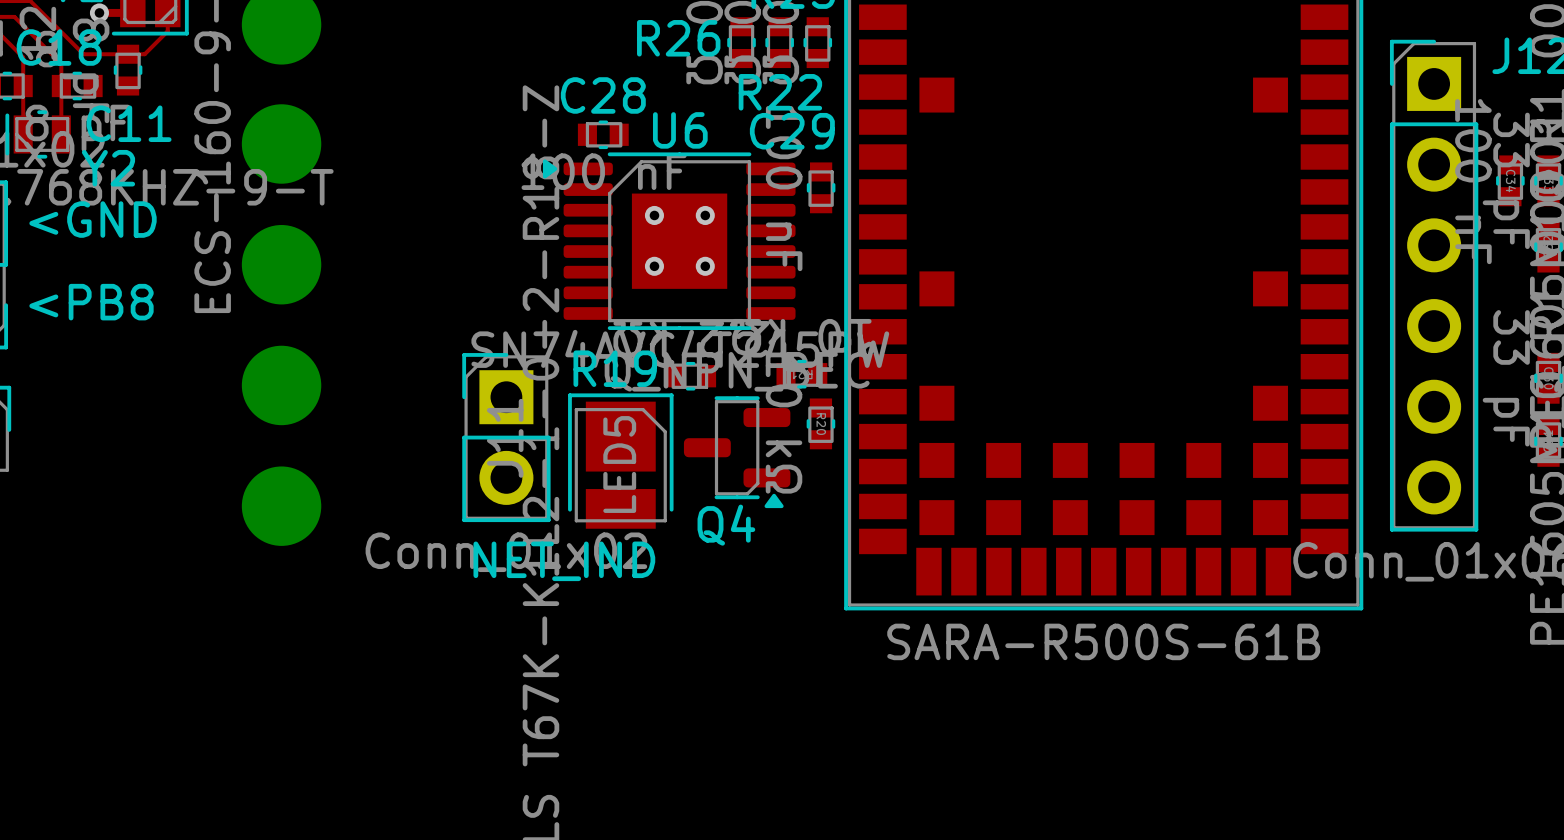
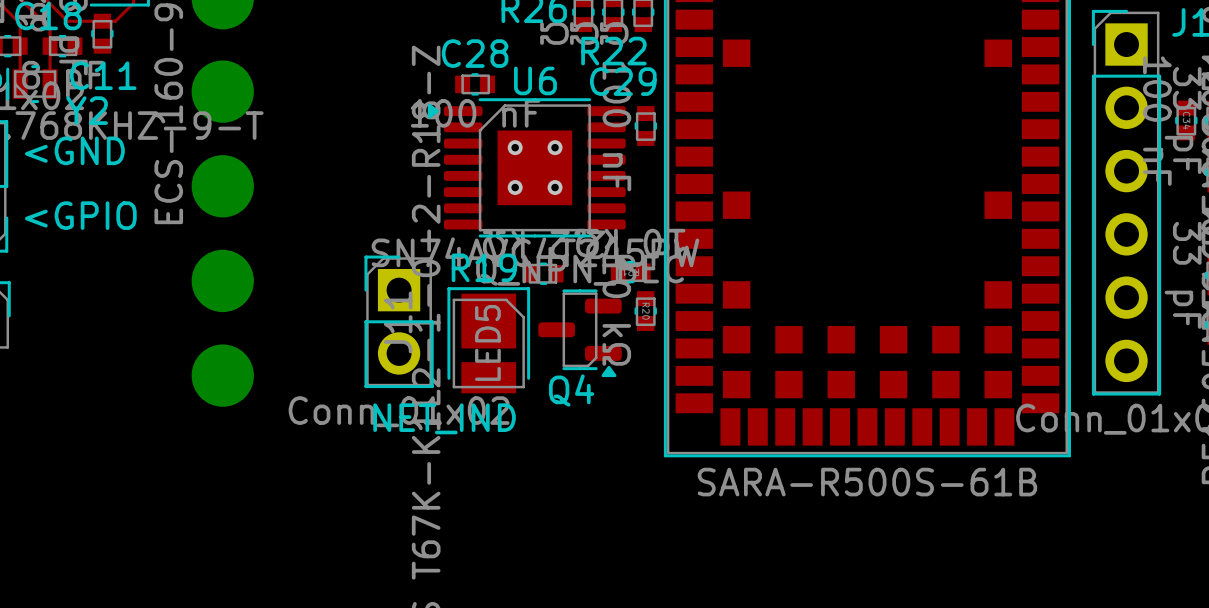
text: <PB8 (91, 302) -> <GPIO (80, 215)

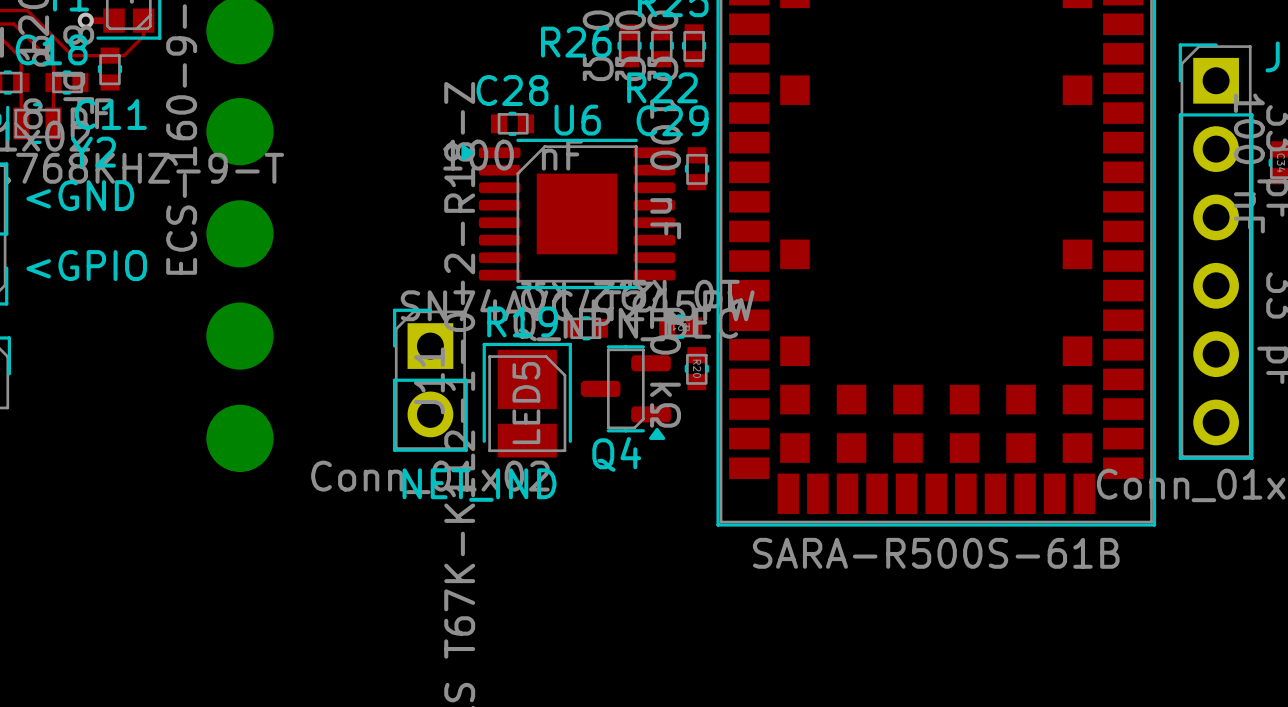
via: (515, 147) -> none
via: (555, 147) -> none
via: (515, 187) -> none
via: (555, 187) -> none

